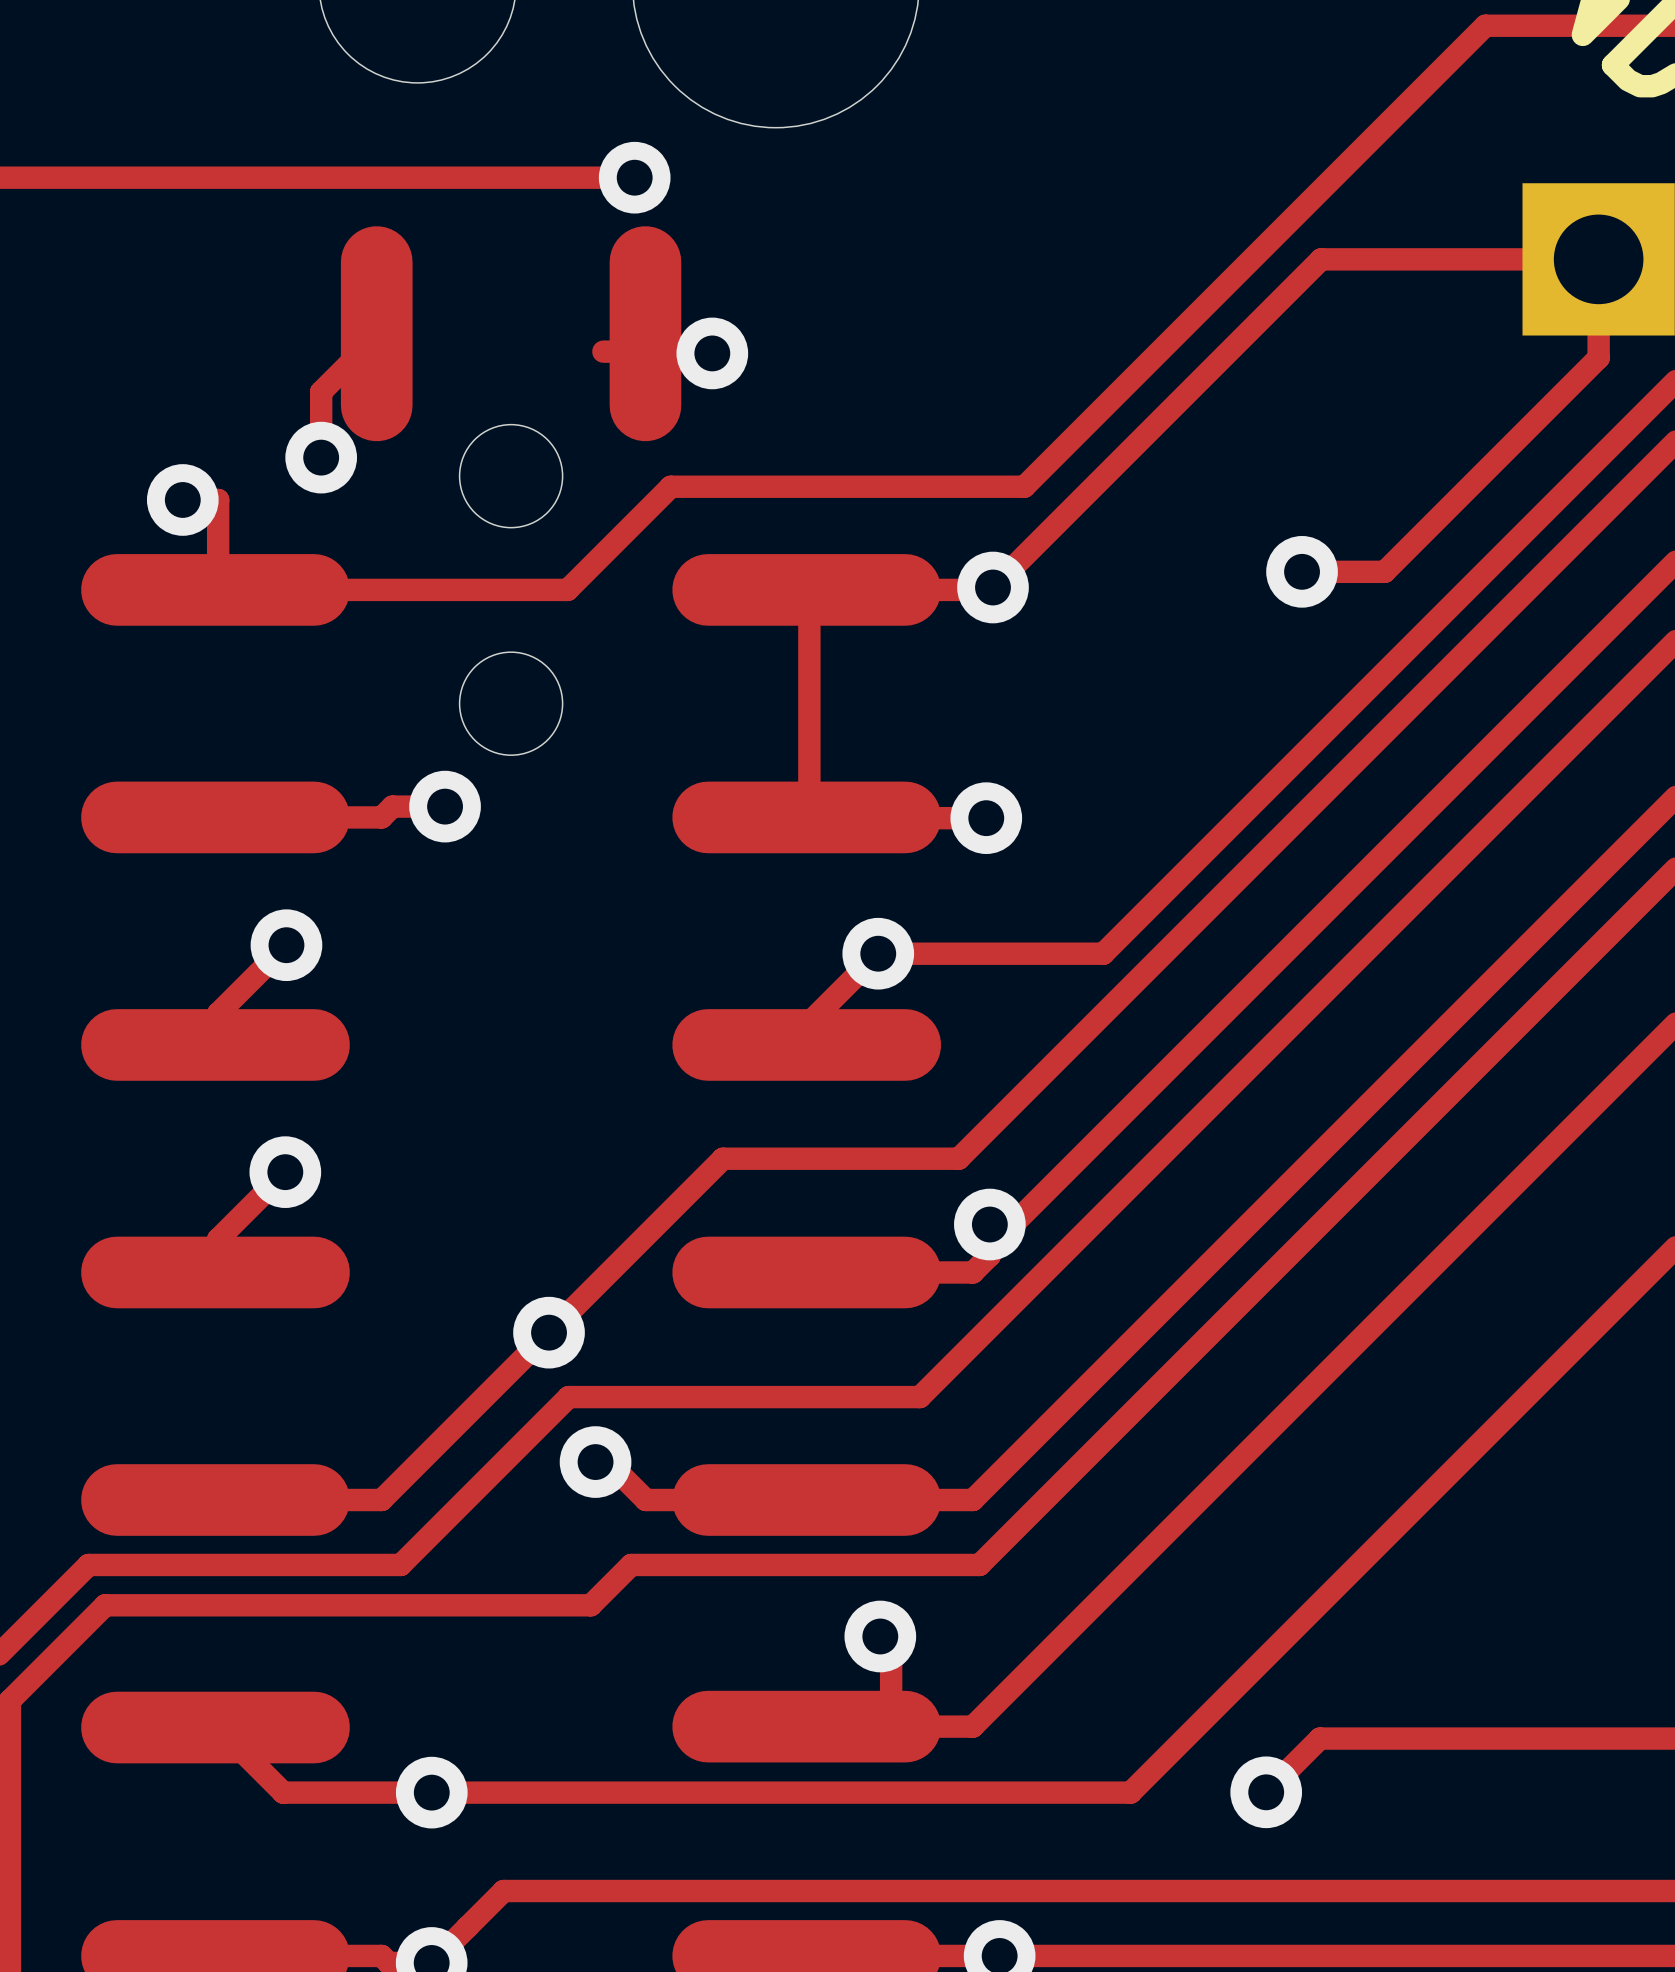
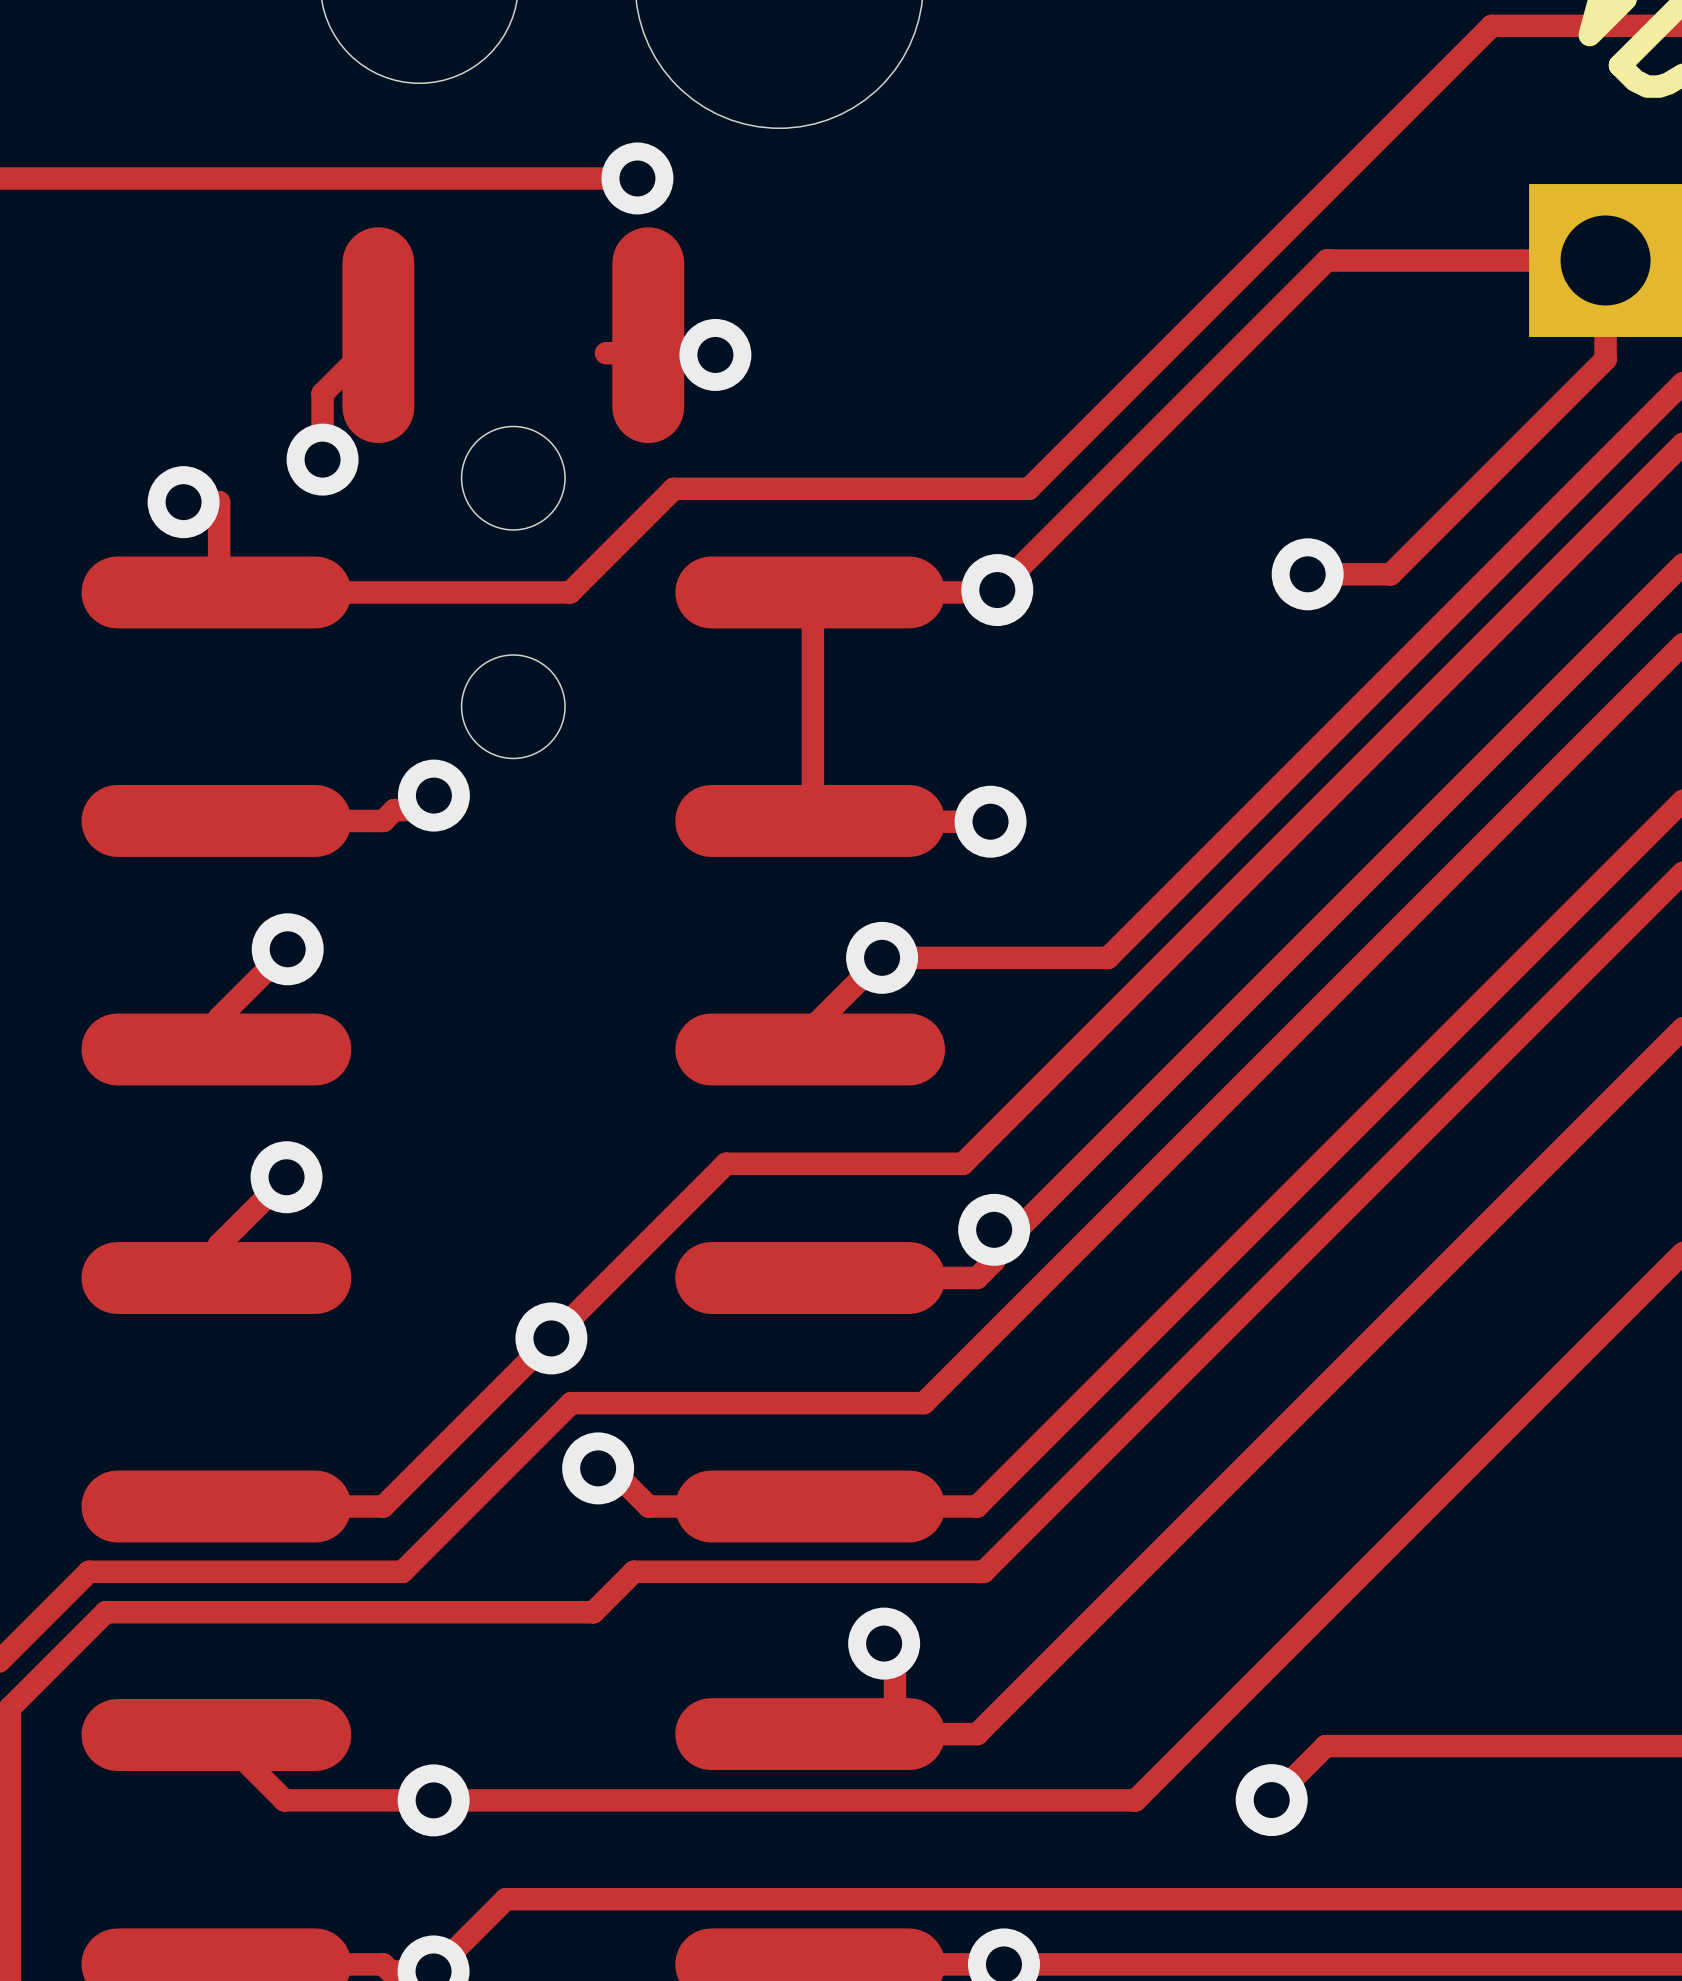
via position: (445, 806) -> (433, 795)

